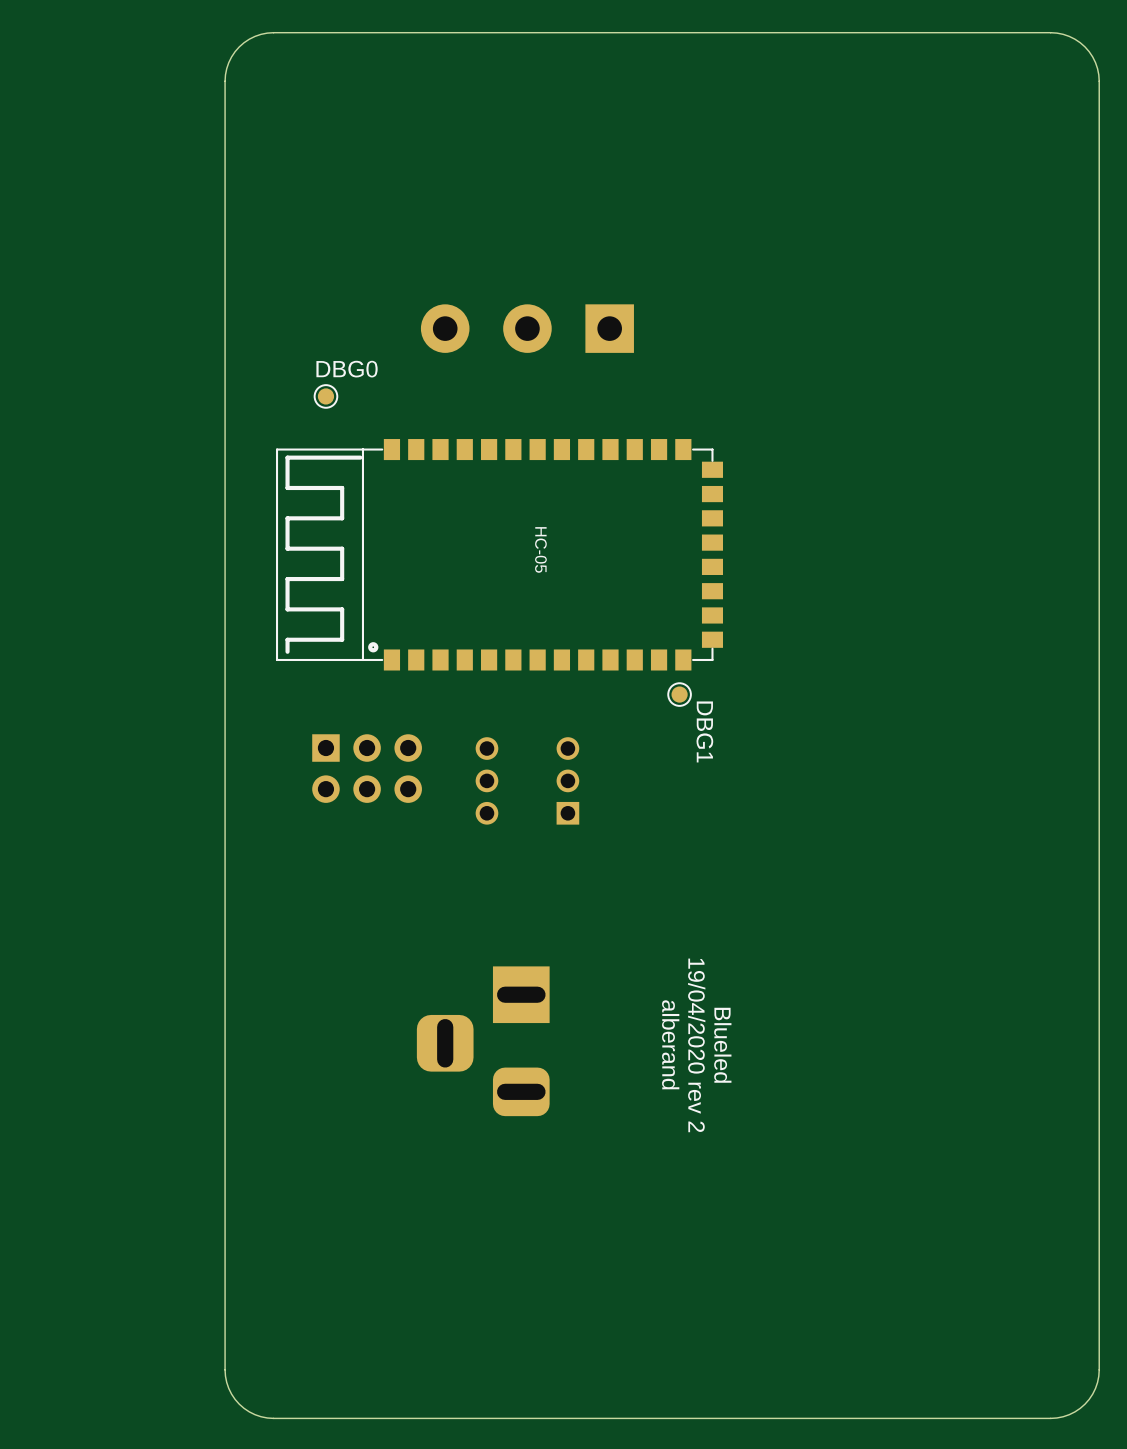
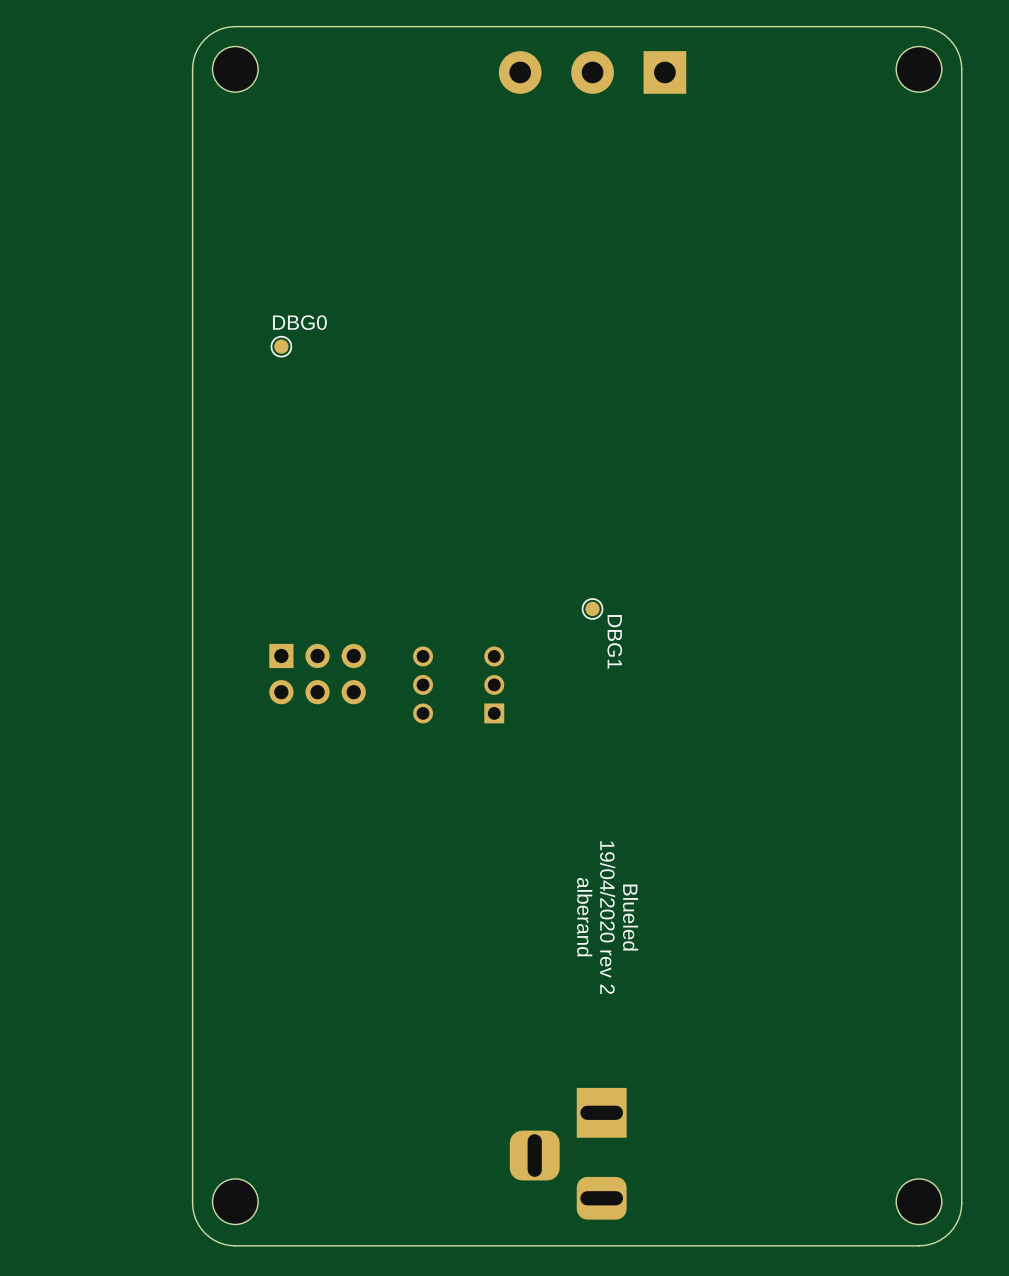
part: none -> (235, 69)
part: none -> (919, 69)
part position: (527, 328) -> (592, 72)
part: HC-05 (499, 554) -> none
part position: (483, 1041) -> (568, 1153)
part: none -> (235, 1201)
part: none -> (919, 1201)

